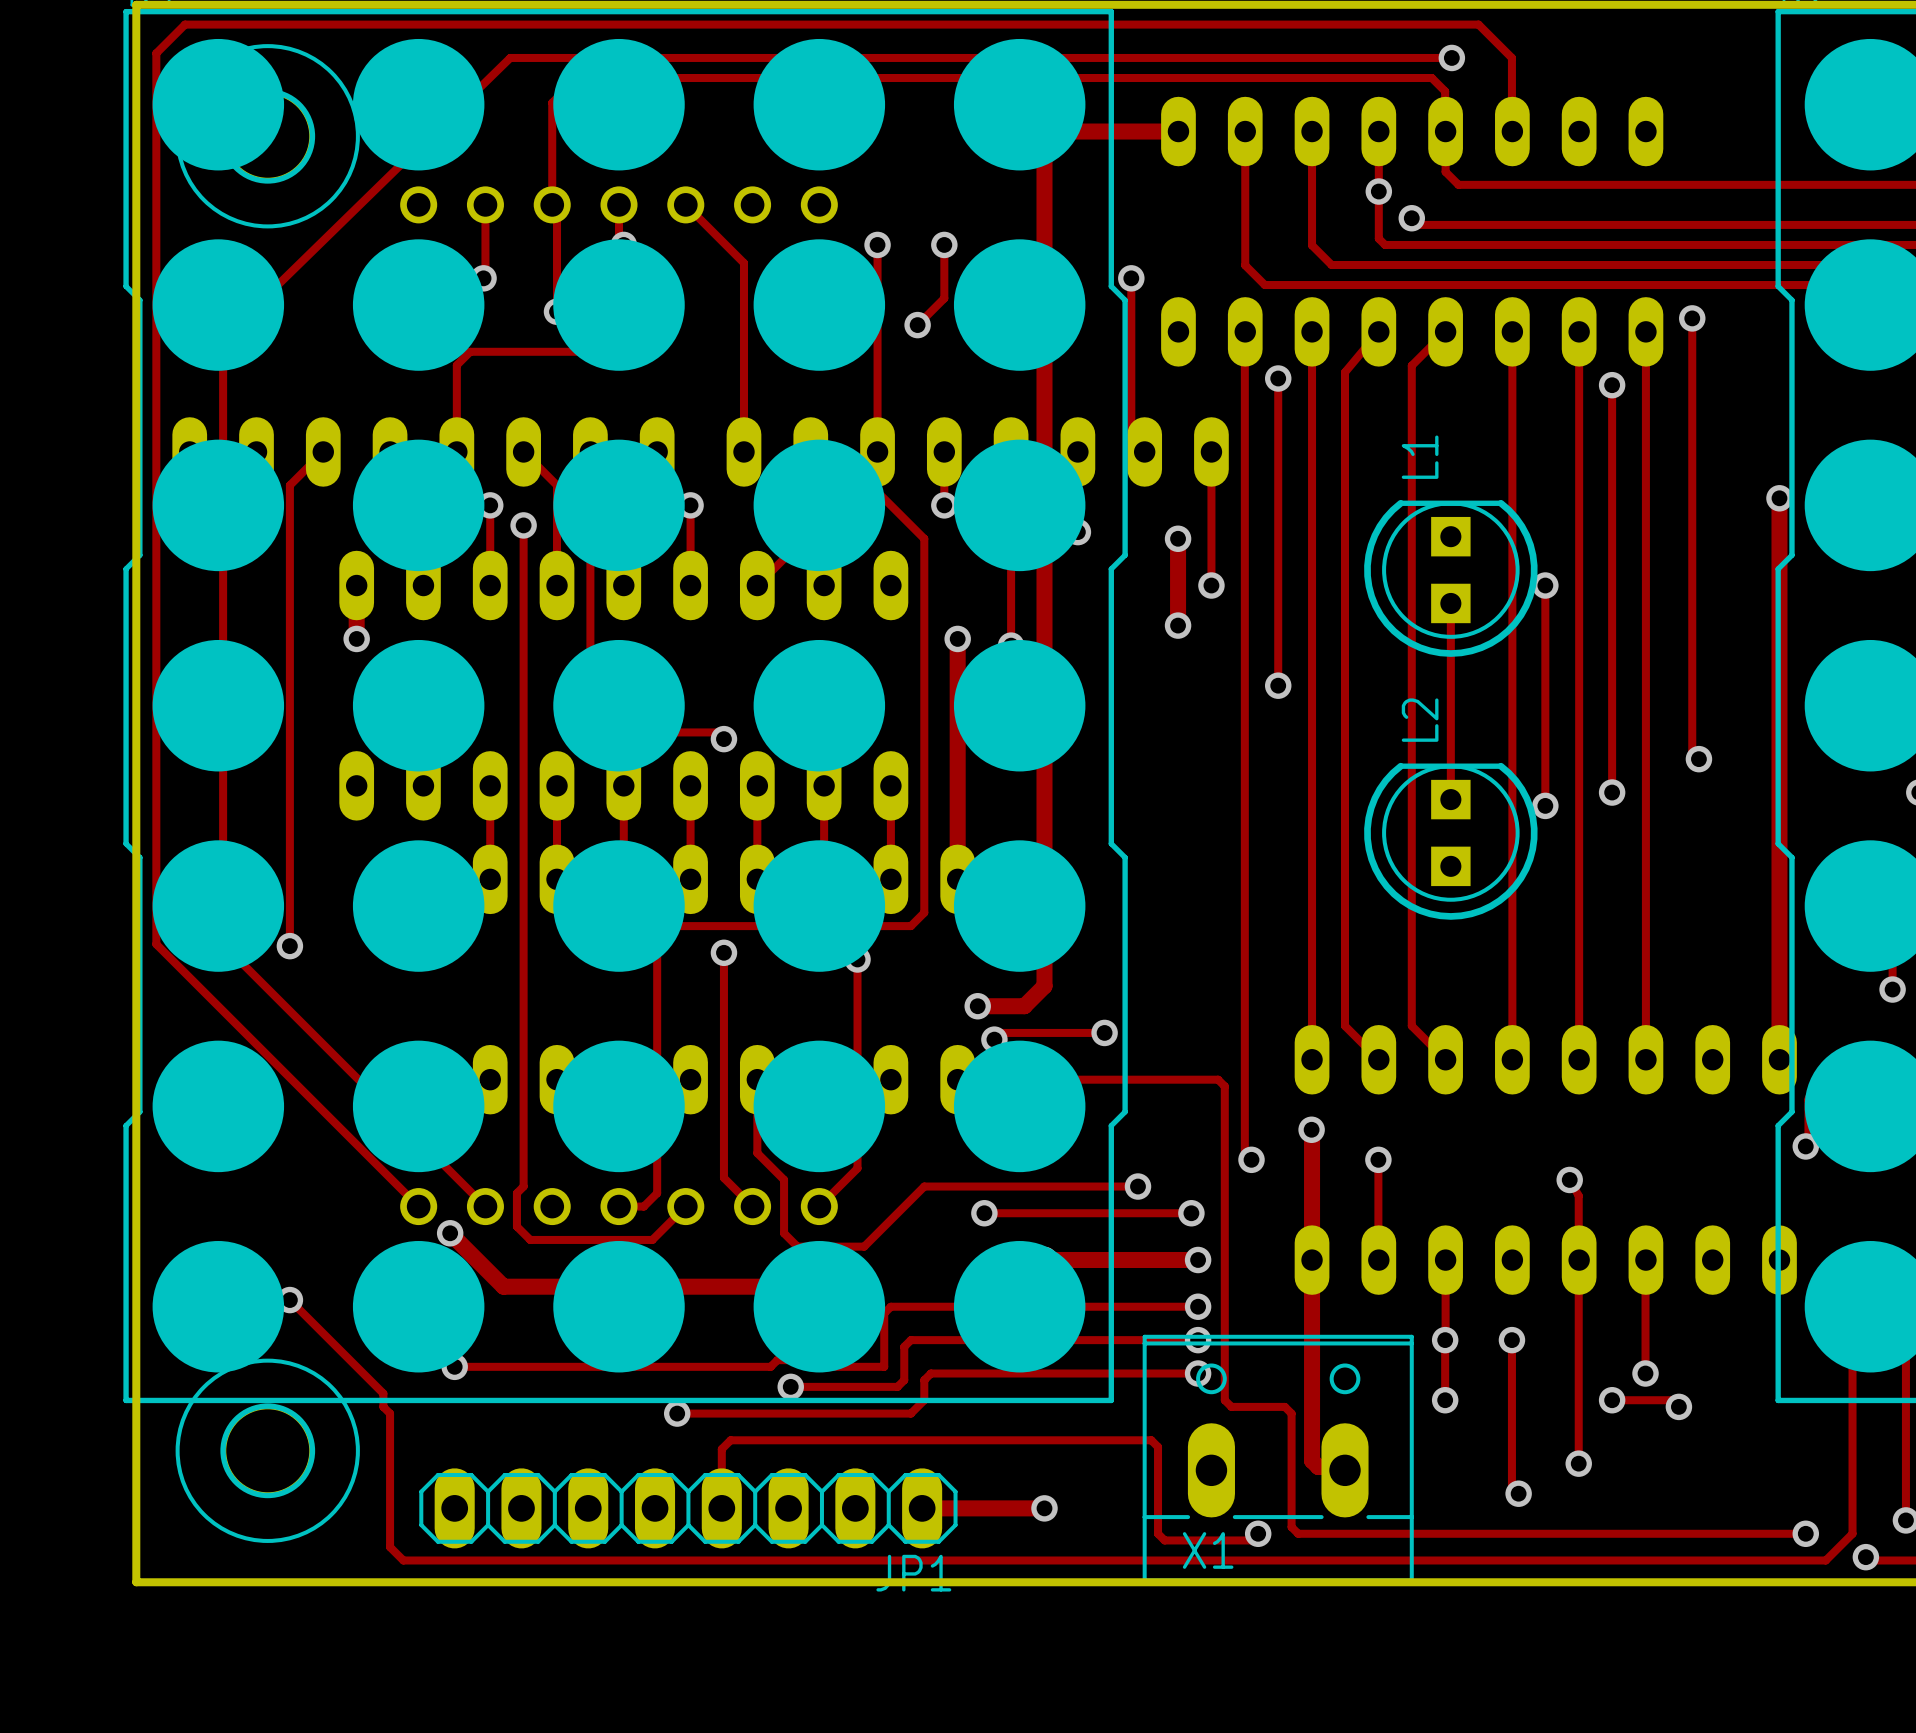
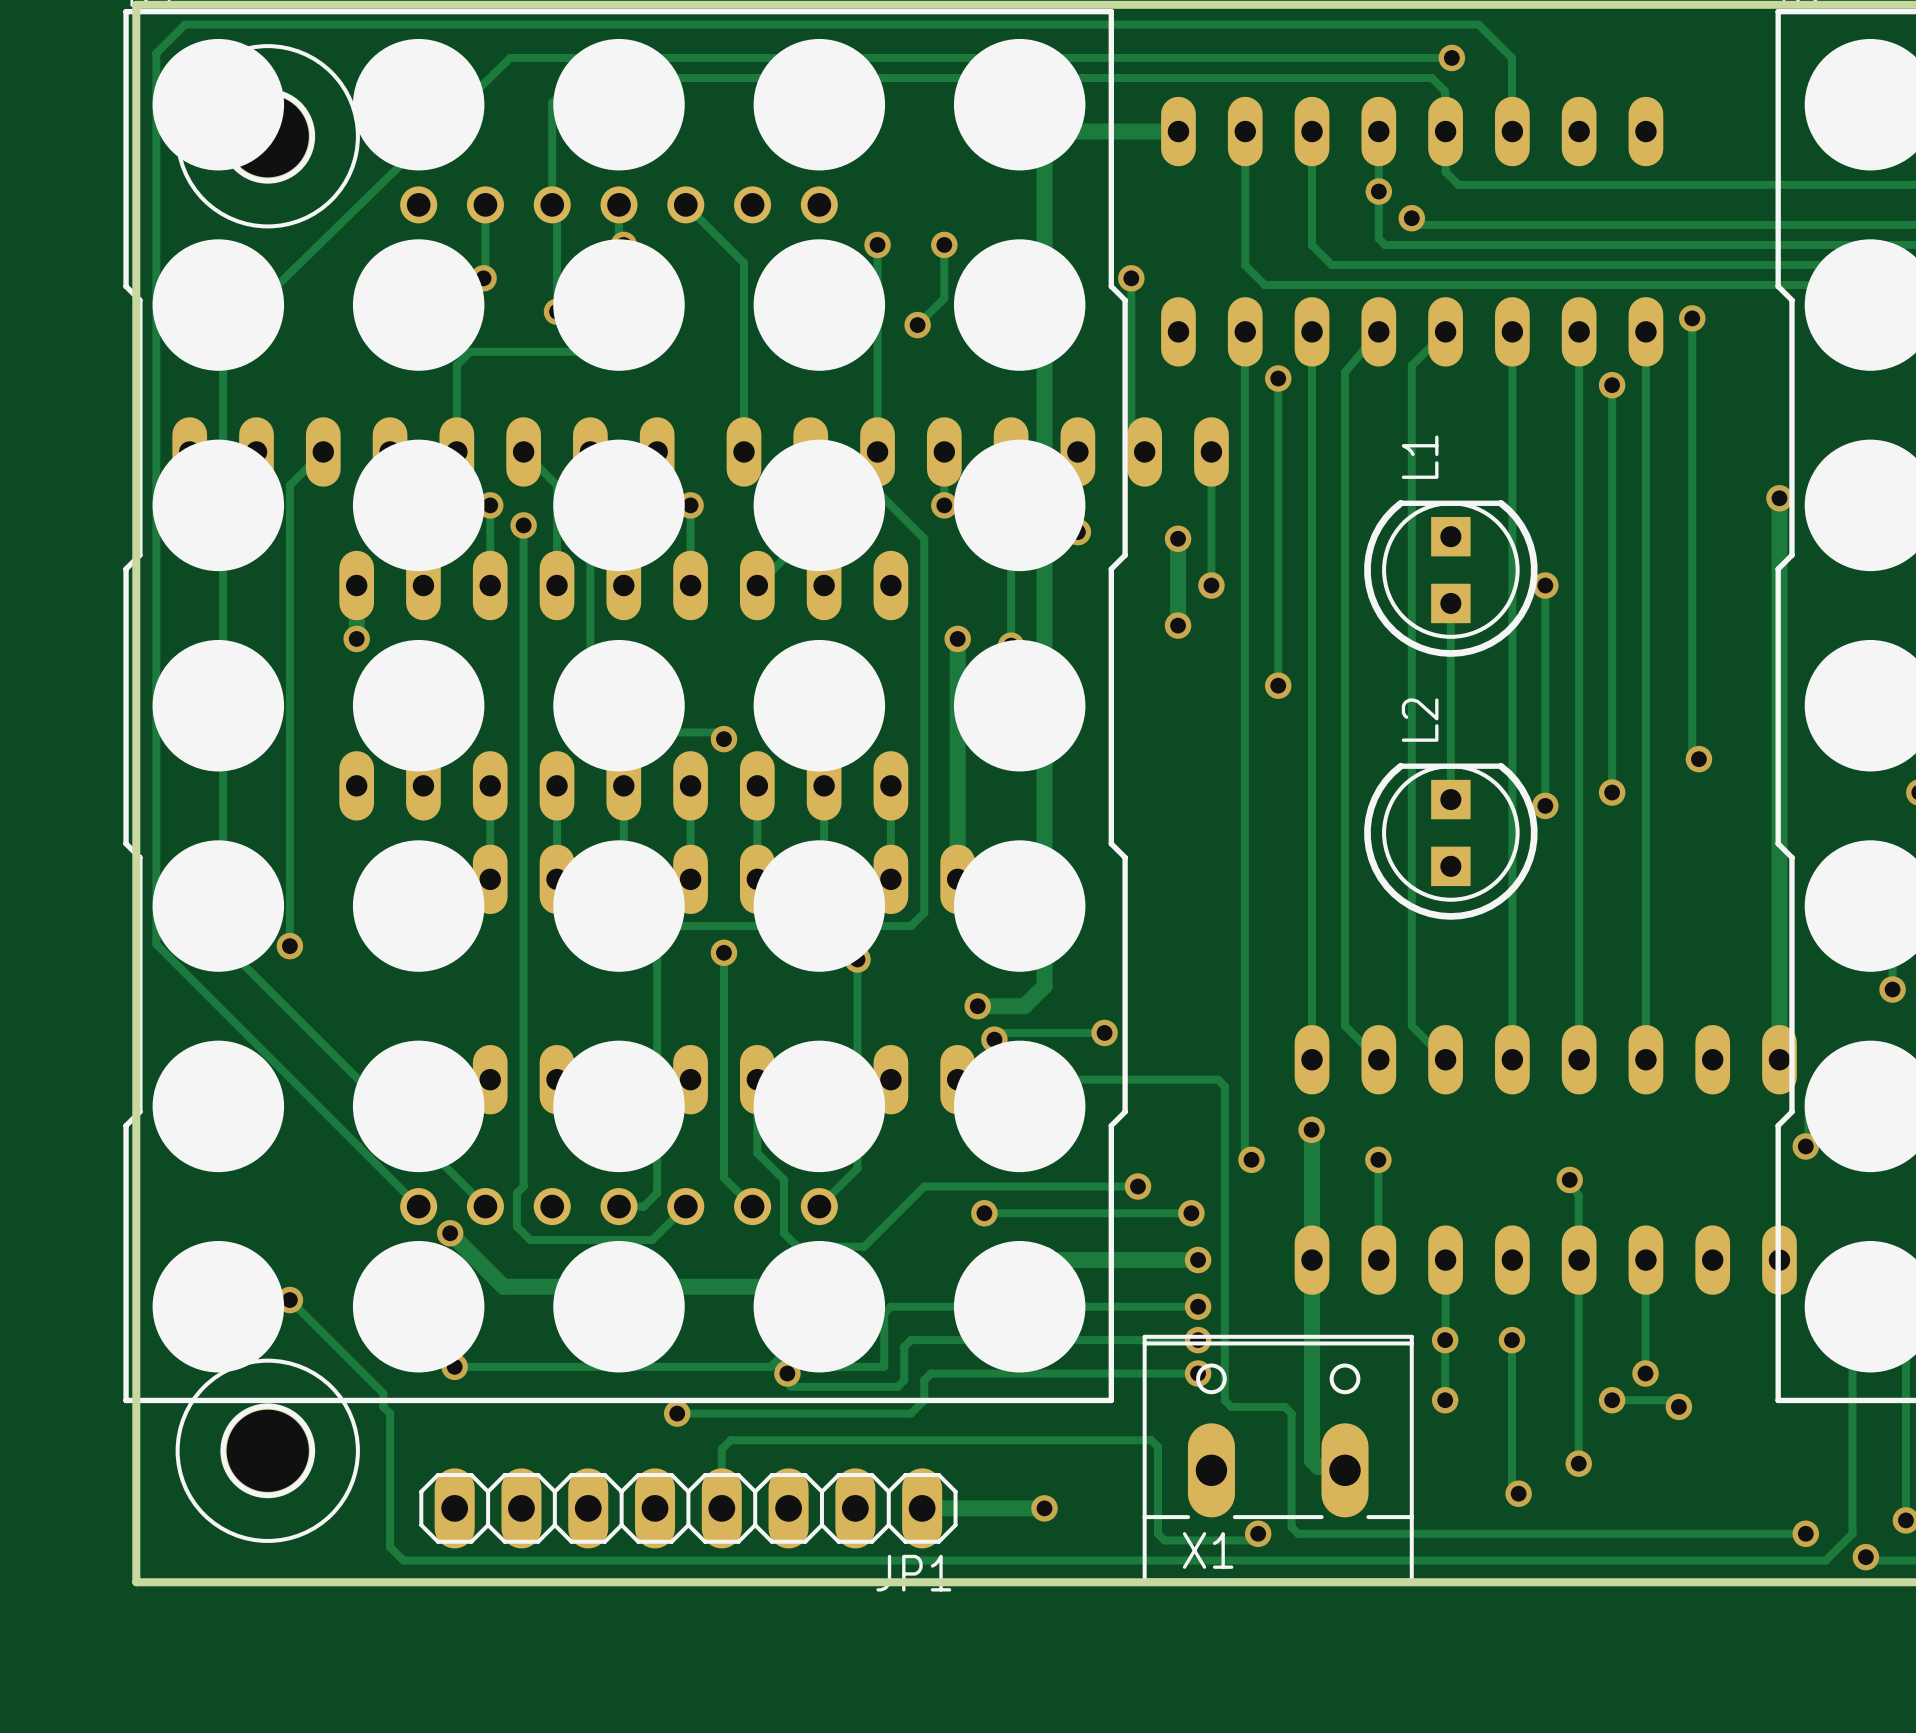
via position: (790, 1386) -> (787, 1373)

